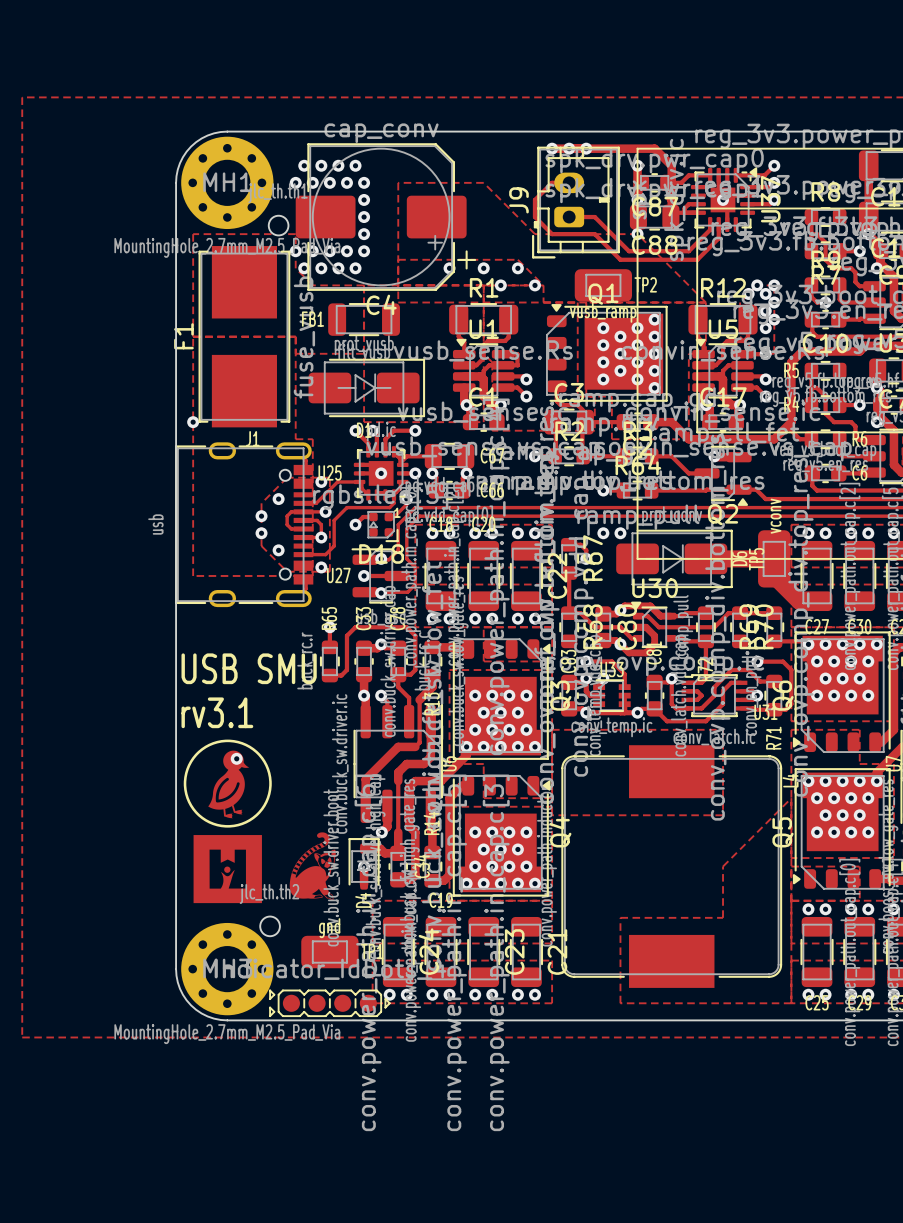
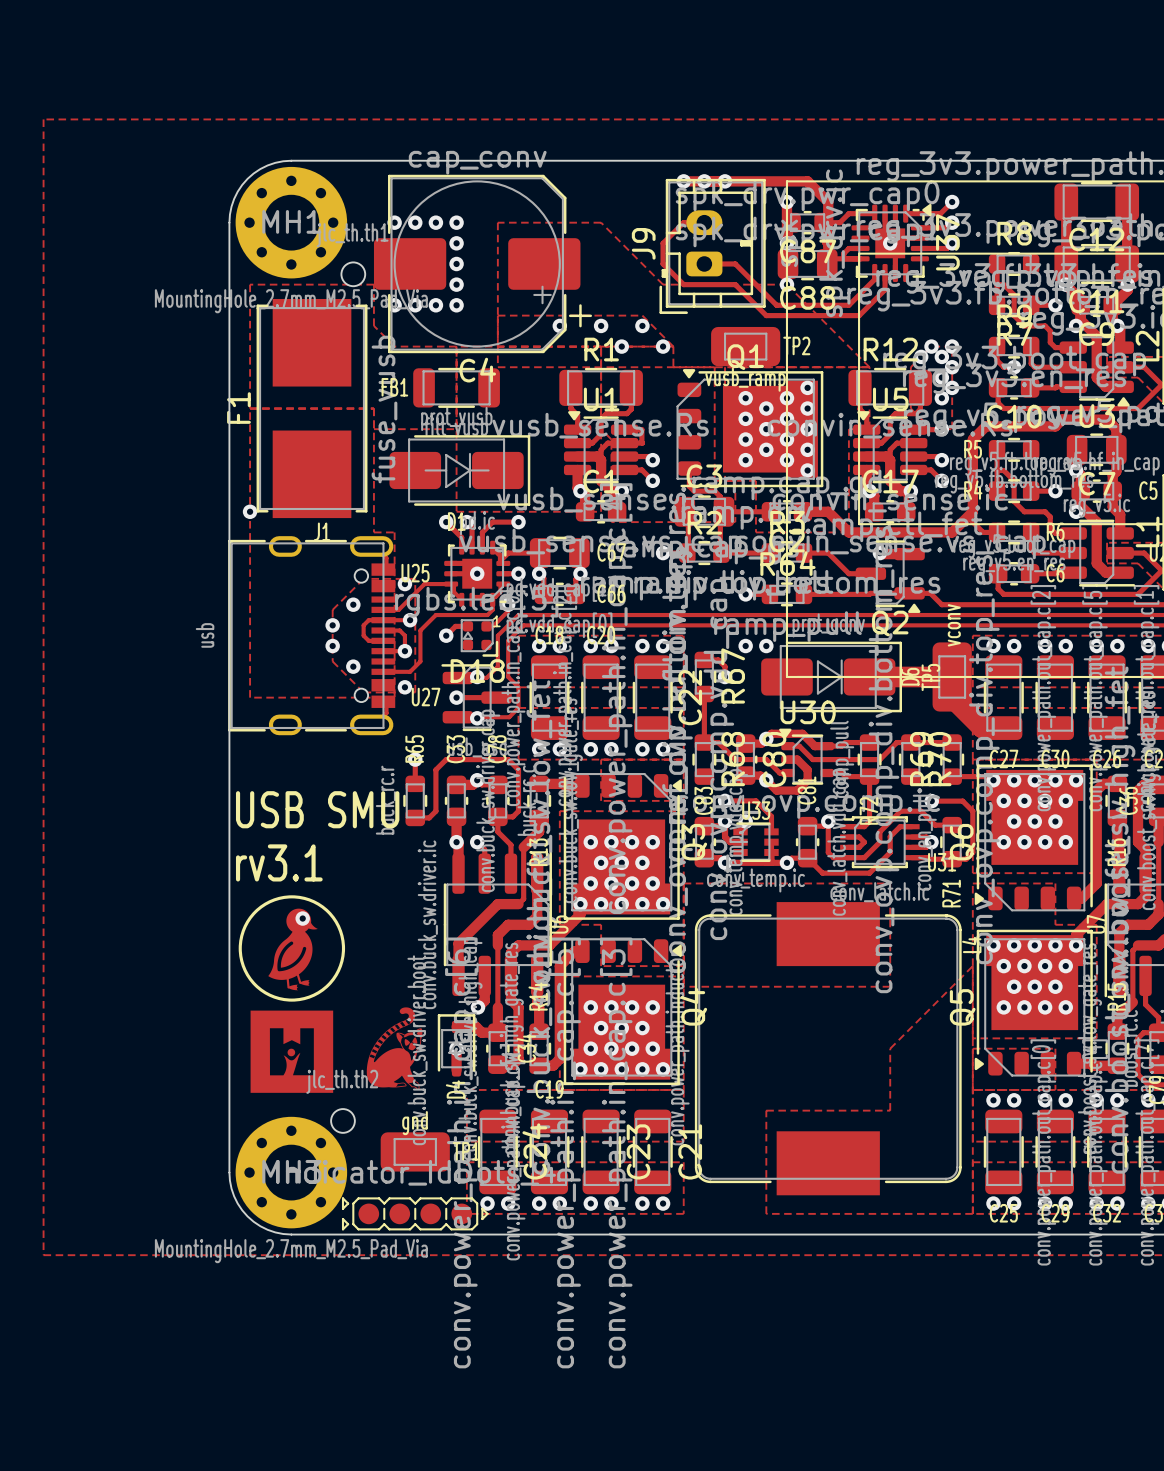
via: (304, 165) -> none
via: (321, 165) -> none
via: (338, 165) -> none
via: (355, 165) -> none
via: (295, 182) -> none
via: (295, 251) -> none
via: (304, 268) -> none
via: (321, 268) -> none
via: (338, 268) -> none
via: (355, 268) -> none

